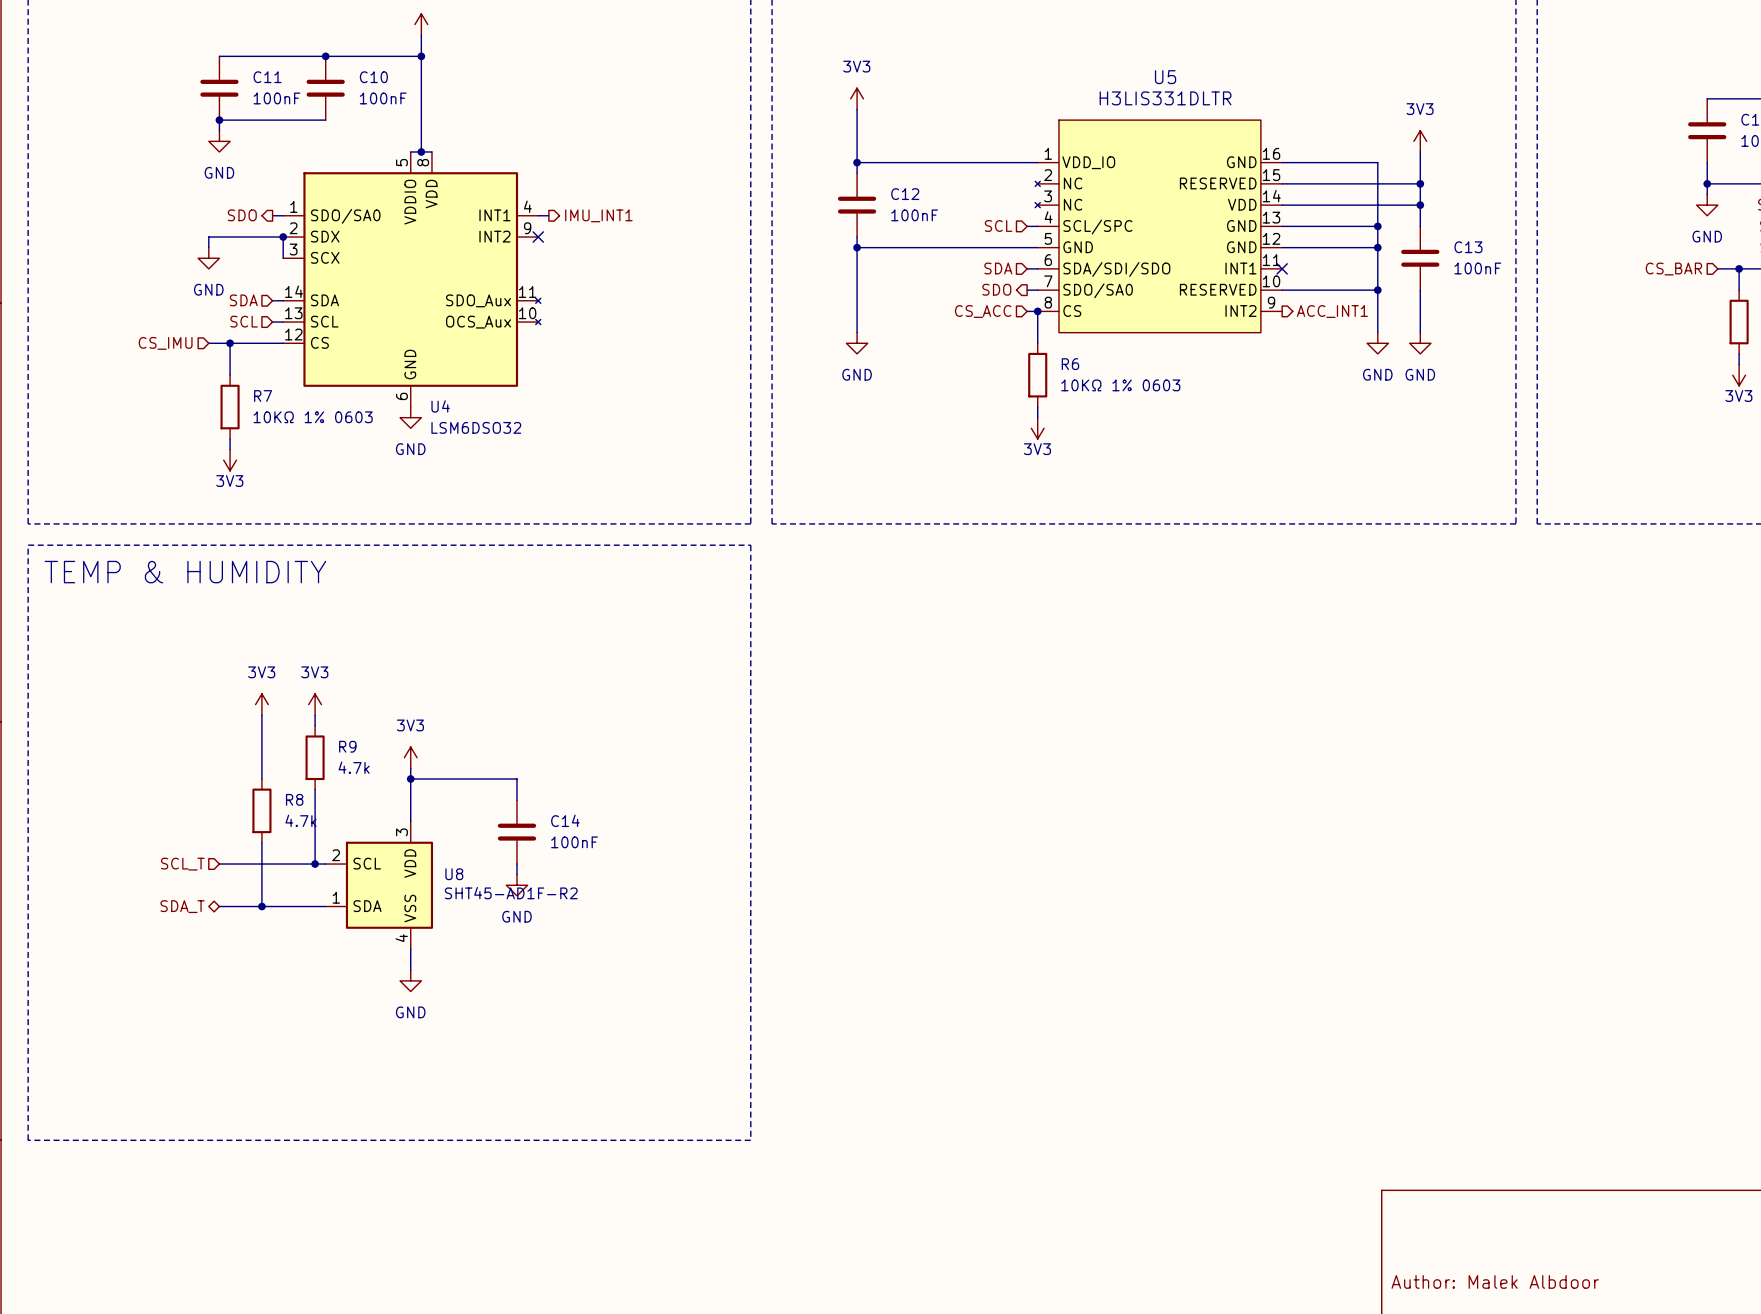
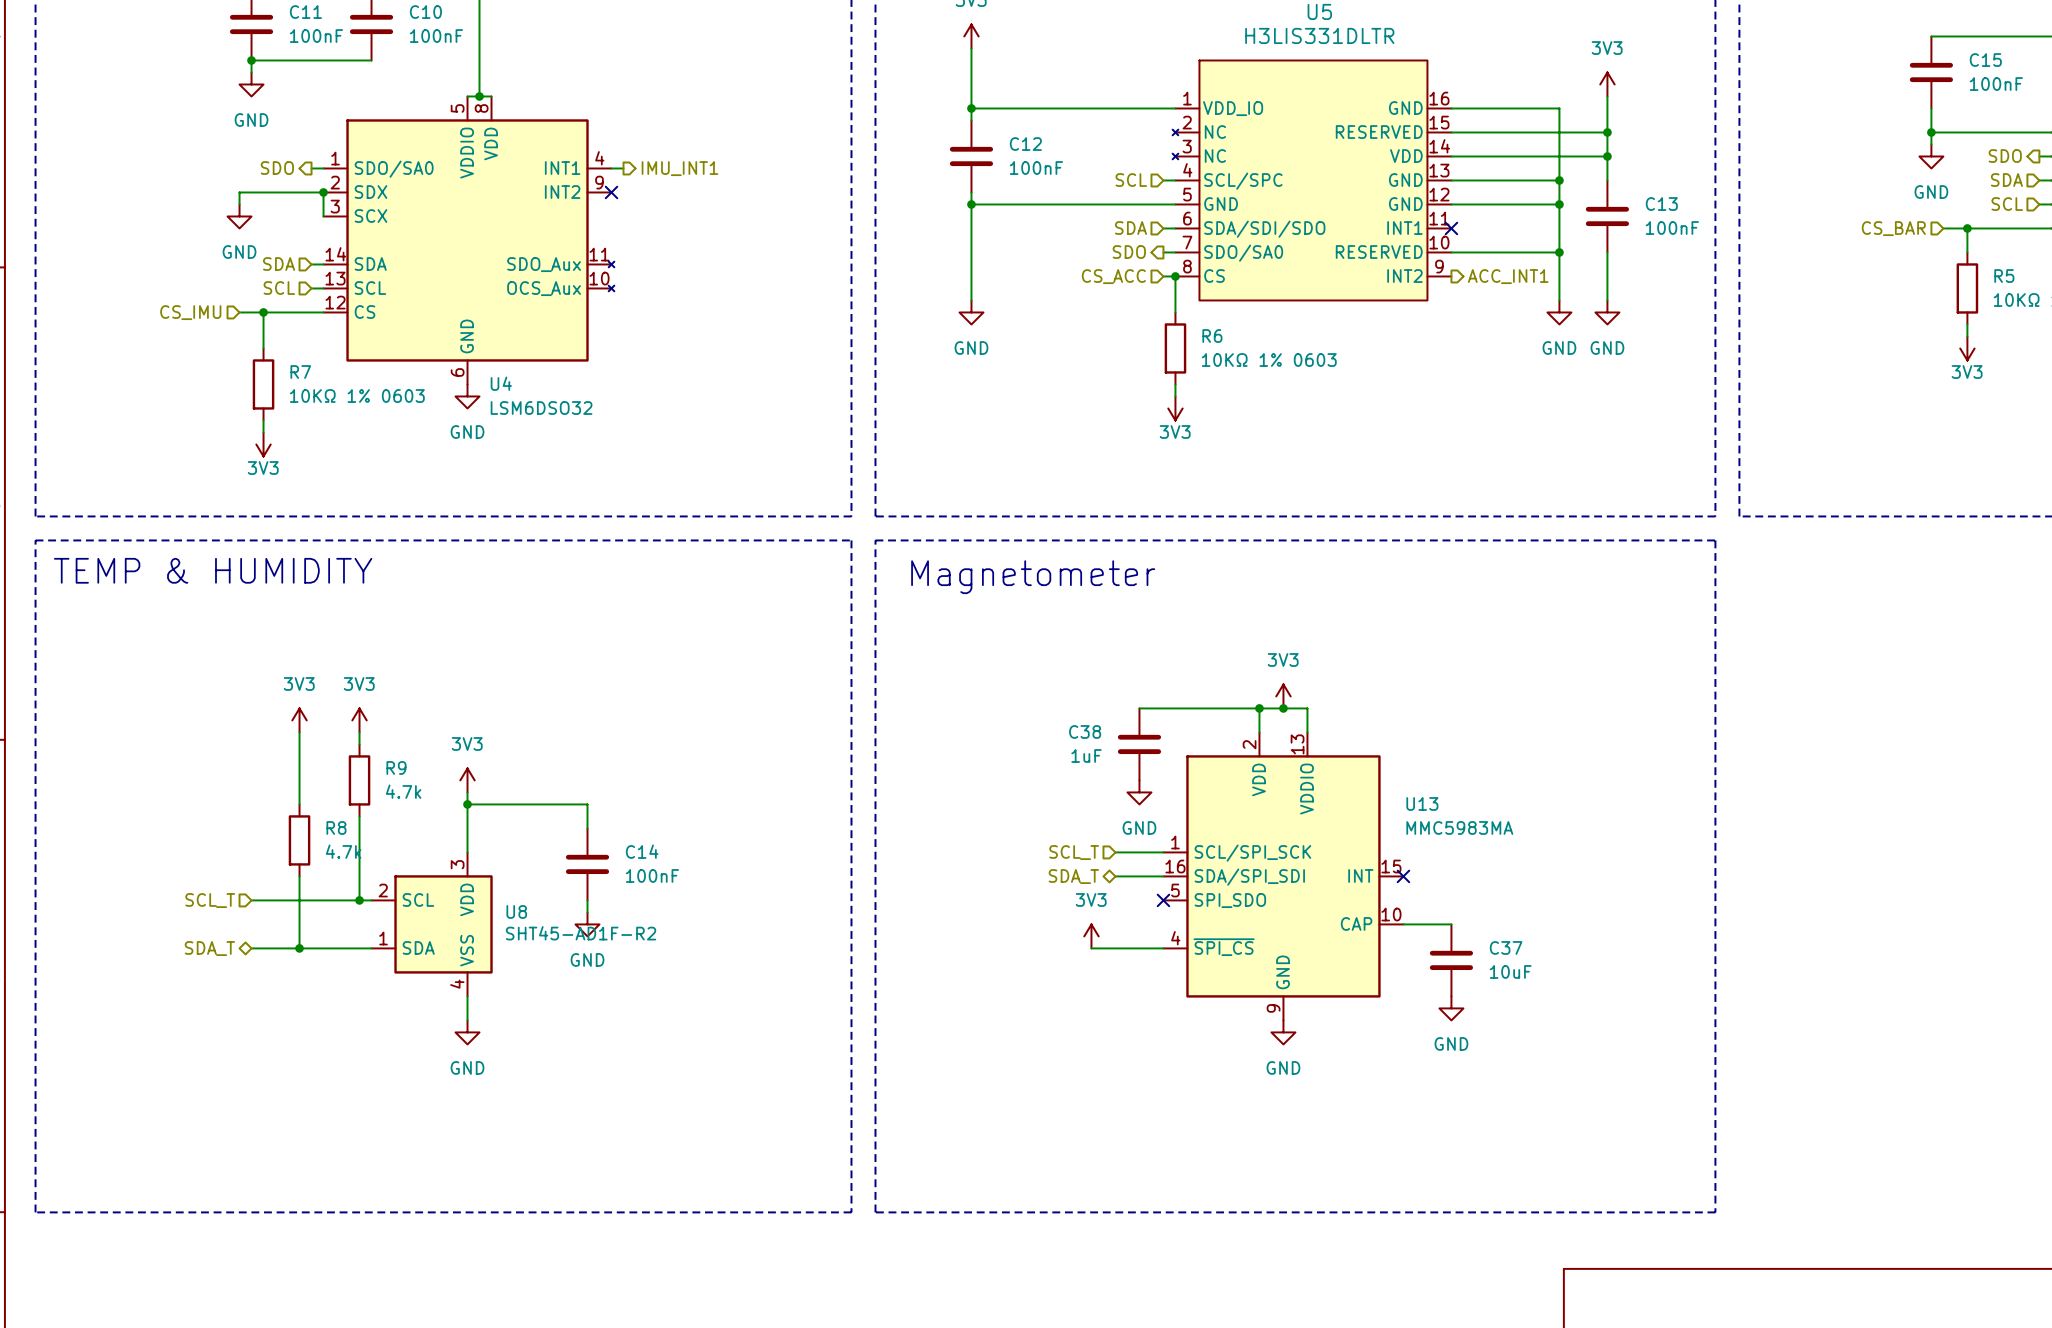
line: none -> (875, 540) (1715, 540) (1715, 1212) (875, 1212) (875, 540)
text: none -> Magnetometer (1033, 577)
power symbol: none -> 3V3 (1283, 696)
wire: none -> (1139, 708) (1307, 708) (1307, 732)
wire: none -> (1259, 708) (1259, 732)
junction: none -> (1259, 708)
junction: none -> (1283, 708)
C38: none -> 1uF (1139, 744)
power symbol: none -> GND (1139, 792)
hierarchical label: none -> SCL_T (1074, 852)
wire: none -> (1115, 852) (1163, 852)
hierarchical label: none -> SDA_T (1073, 876)
wire: none -> (1115, 876) (1163, 876)
U13: none -> MMC5983MA (1283, 876)
no-connect mark: none -> (1403, 876)
no-connect mark: none -> (1163, 900)
wire: none -> (1403, 924) (1451, 924)
power symbol: none -> 3V3 (1091, 936)
wire: none -> (1091, 948) (1163, 948)
C37: none -> 10uF (1451, 960)
power symbol: none -> GND (1451, 1008)
power symbol: none -> GND (1283, 1032)

